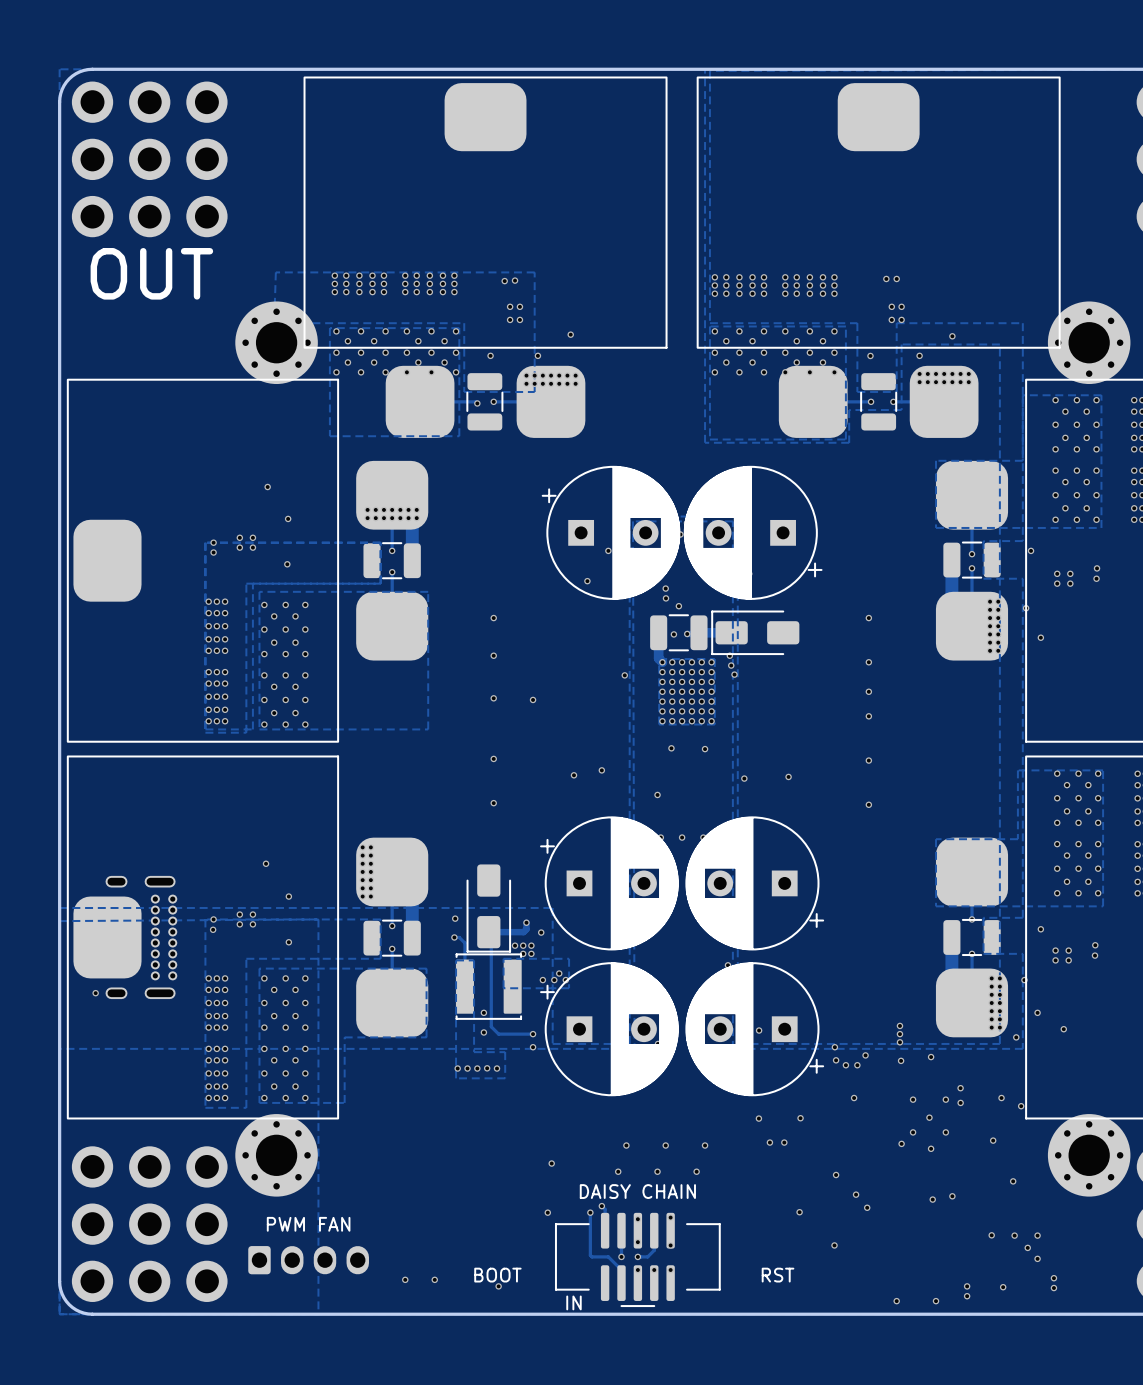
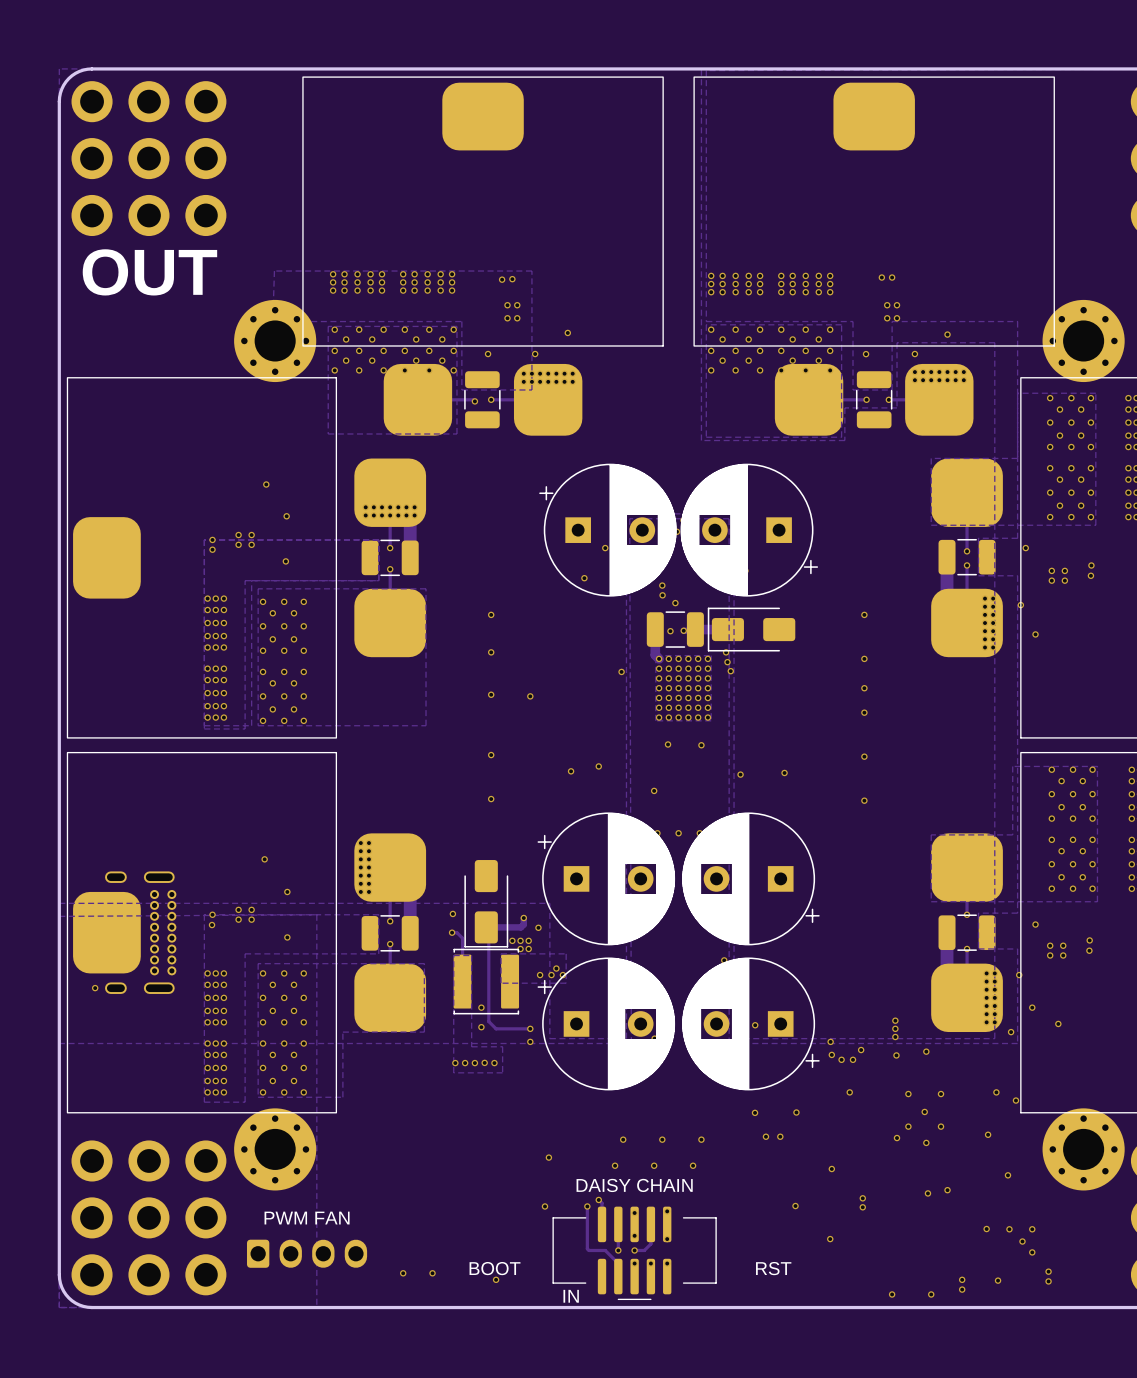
via: (960, 1088) -> none
via: (960, 1102) -> none
via: (856, 1194) -> none
via: none -> (862, 1198)
via: (867, 1207) -> none
via: none -> (862, 1207)

